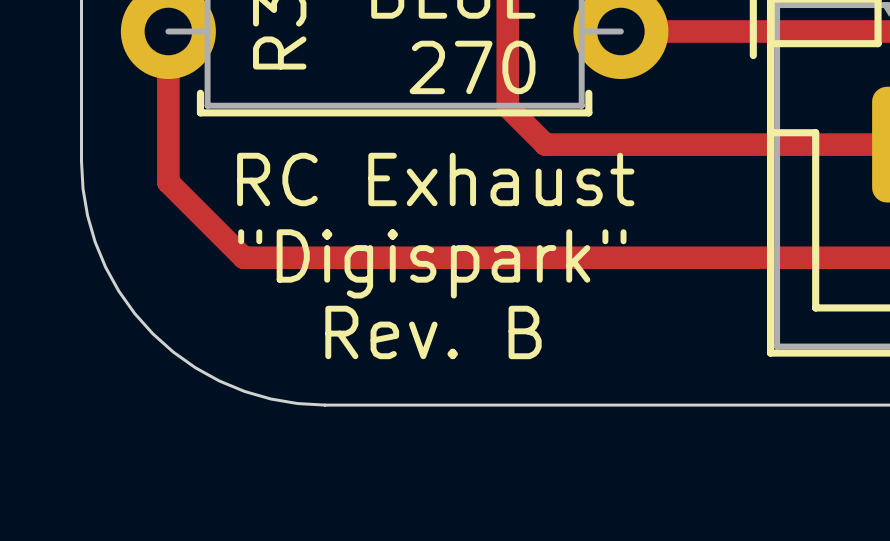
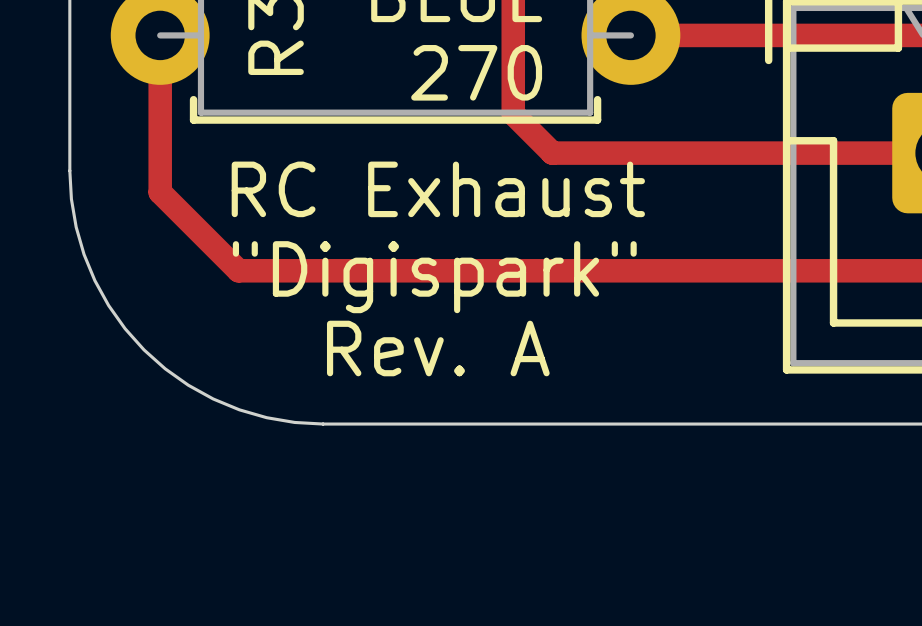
text: Rev. B (433, 332) -> Rev. A (438, 348)

